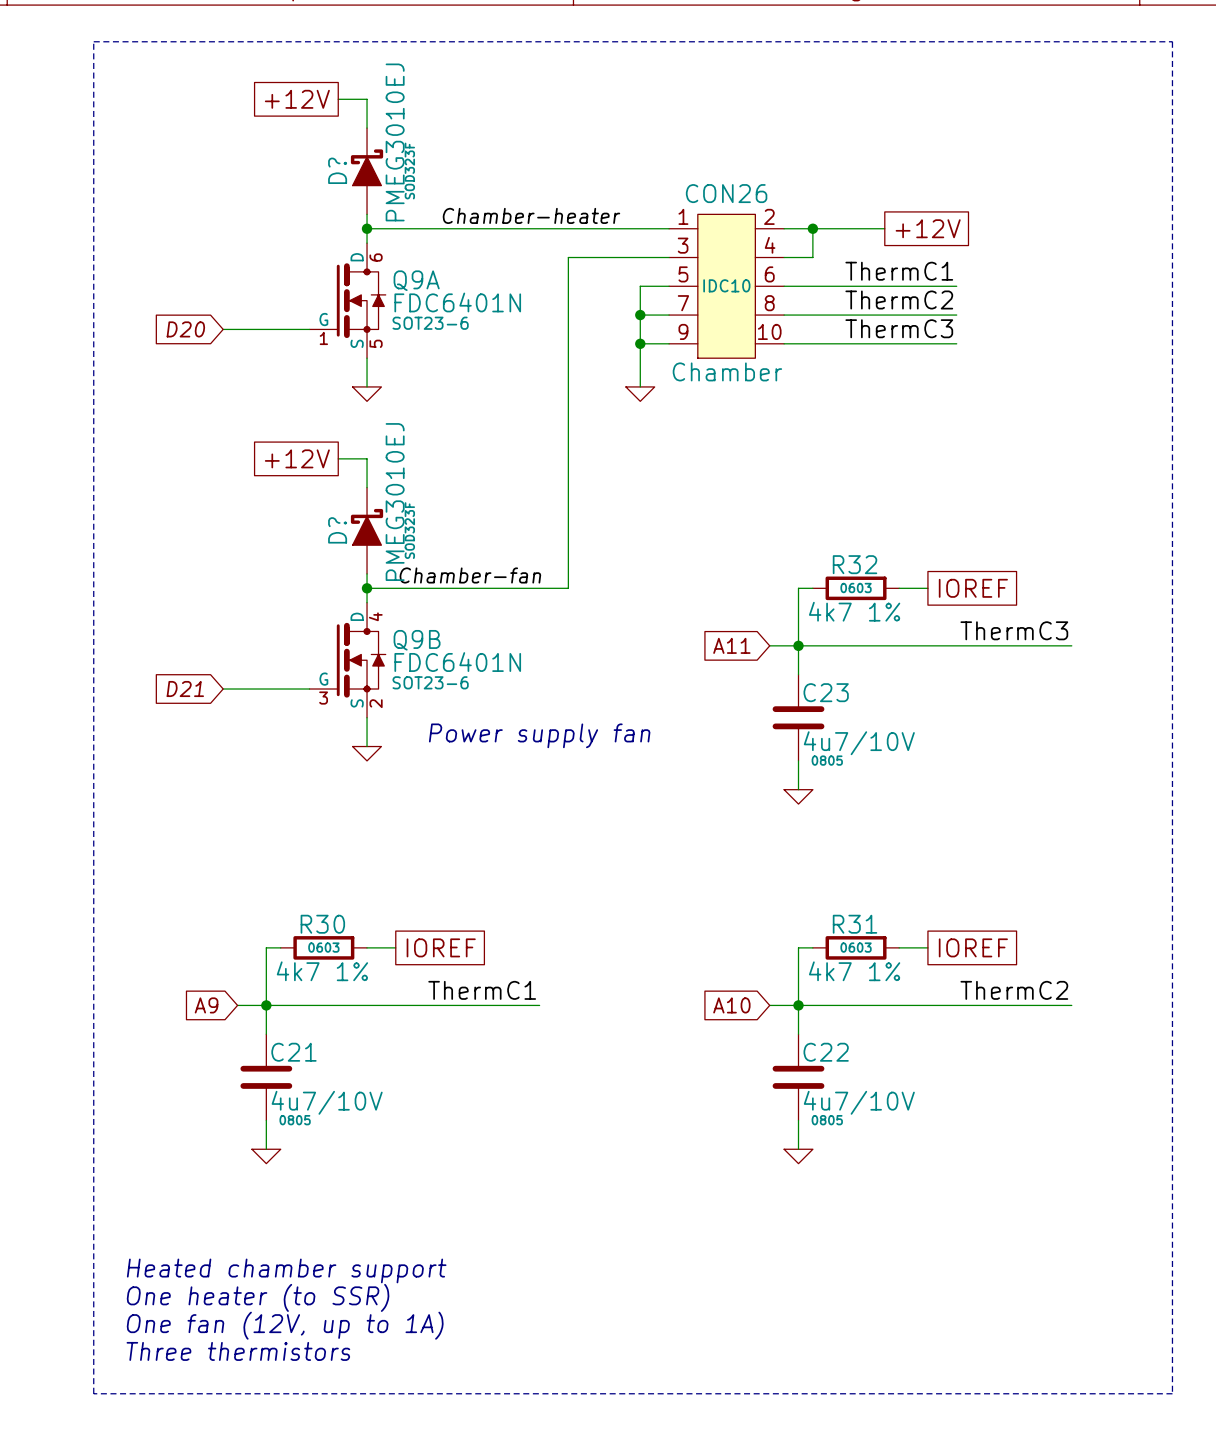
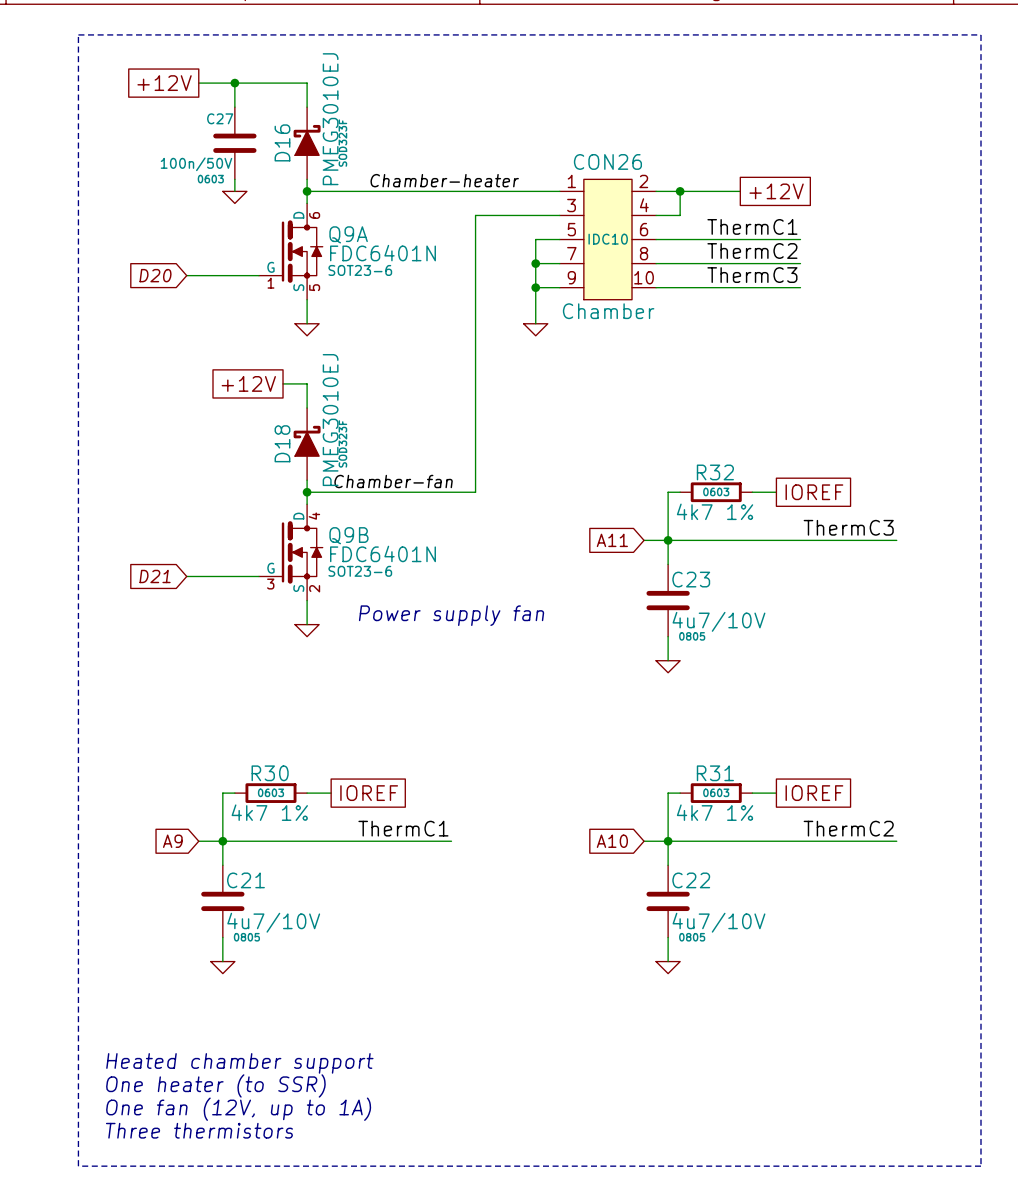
wire: none -> (198, 83) (283, 83)
wire: none -> (234, 83) (234, 107)
junction: none -> (234, 83)
global label position: +12V (297, 99) -> +12V (164, 83)
D? name: D? (337, 170) -> D16 (282, 142)
C27: none -> 100n/50V (234, 143)
wire: none -> (234, 179) (234, 191)
power symbol: none -> (234, 197)
D? name: D? (337, 530) -> D18 (282, 443)

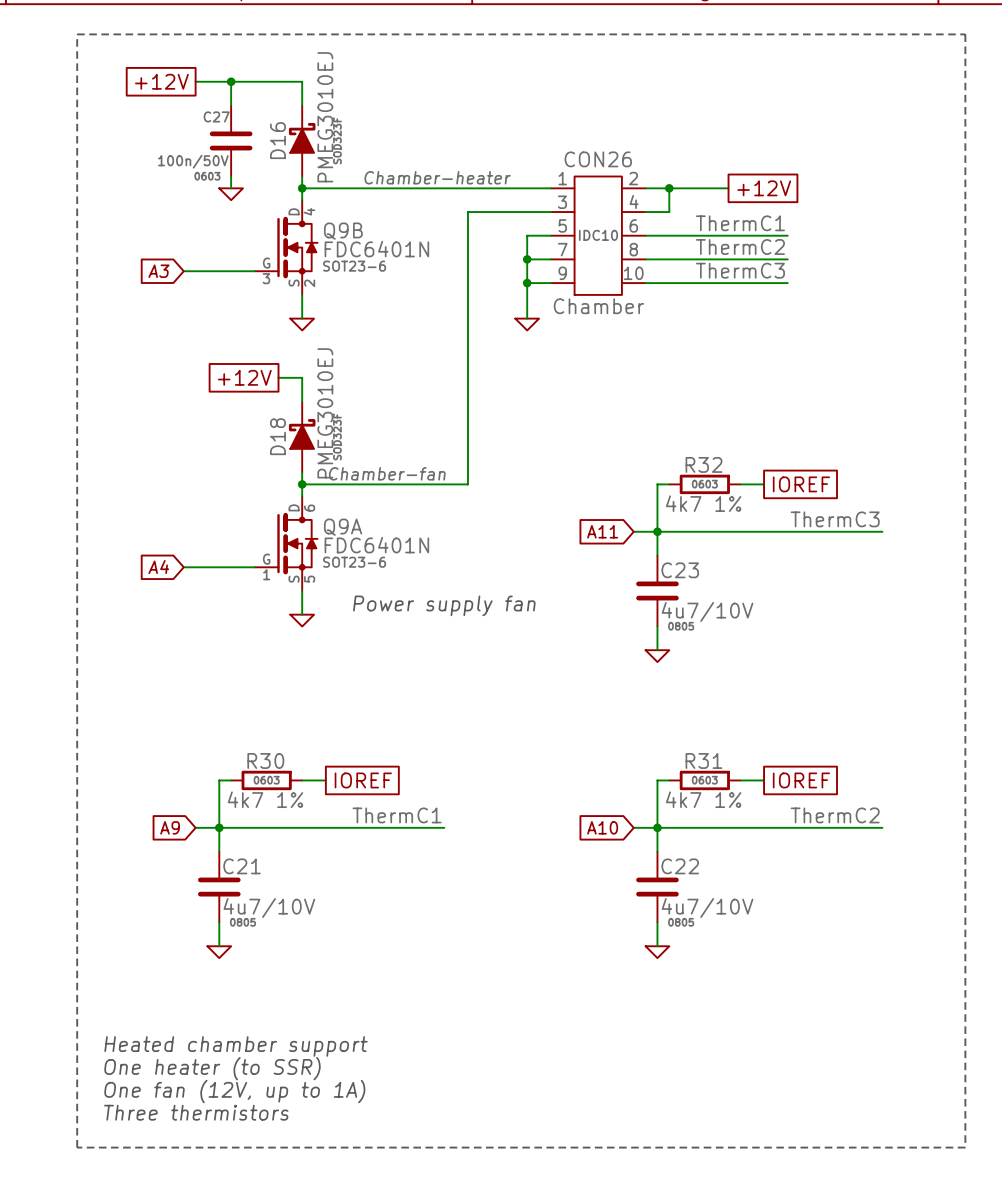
Q9A position: (290, 251) -> (286, 543)
global label: D20 (155, 275) -> A3 (158, 271)
Q9B position: (290, 552) -> (286, 247)
global label: D21 (155, 576) -> A4 (158, 567)

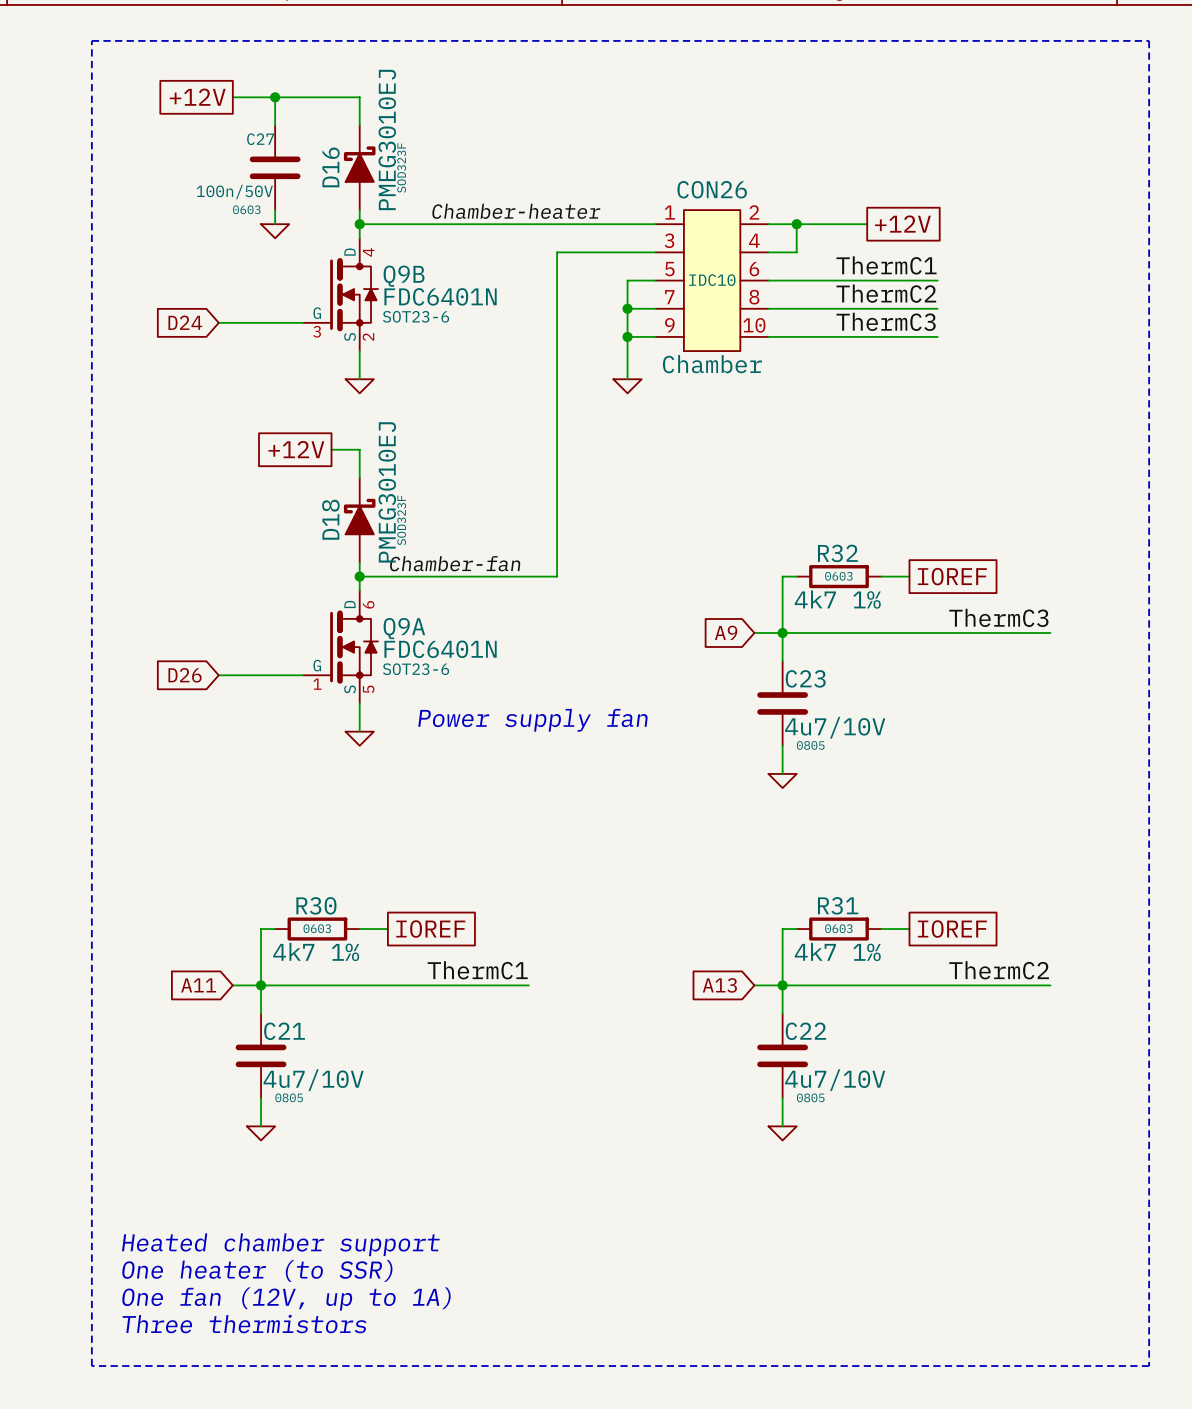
global label: A3 (158, 271) -> D24 (185, 322)
global label: A11 (602, 531) -> A9 (726, 632)
global label: A4 (158, 567) -> D26 (185, 675)
global label: A9 (170, 827) -> A11 (198, 985)
global label: A10 (602, 827) -> A13 (719, 985)

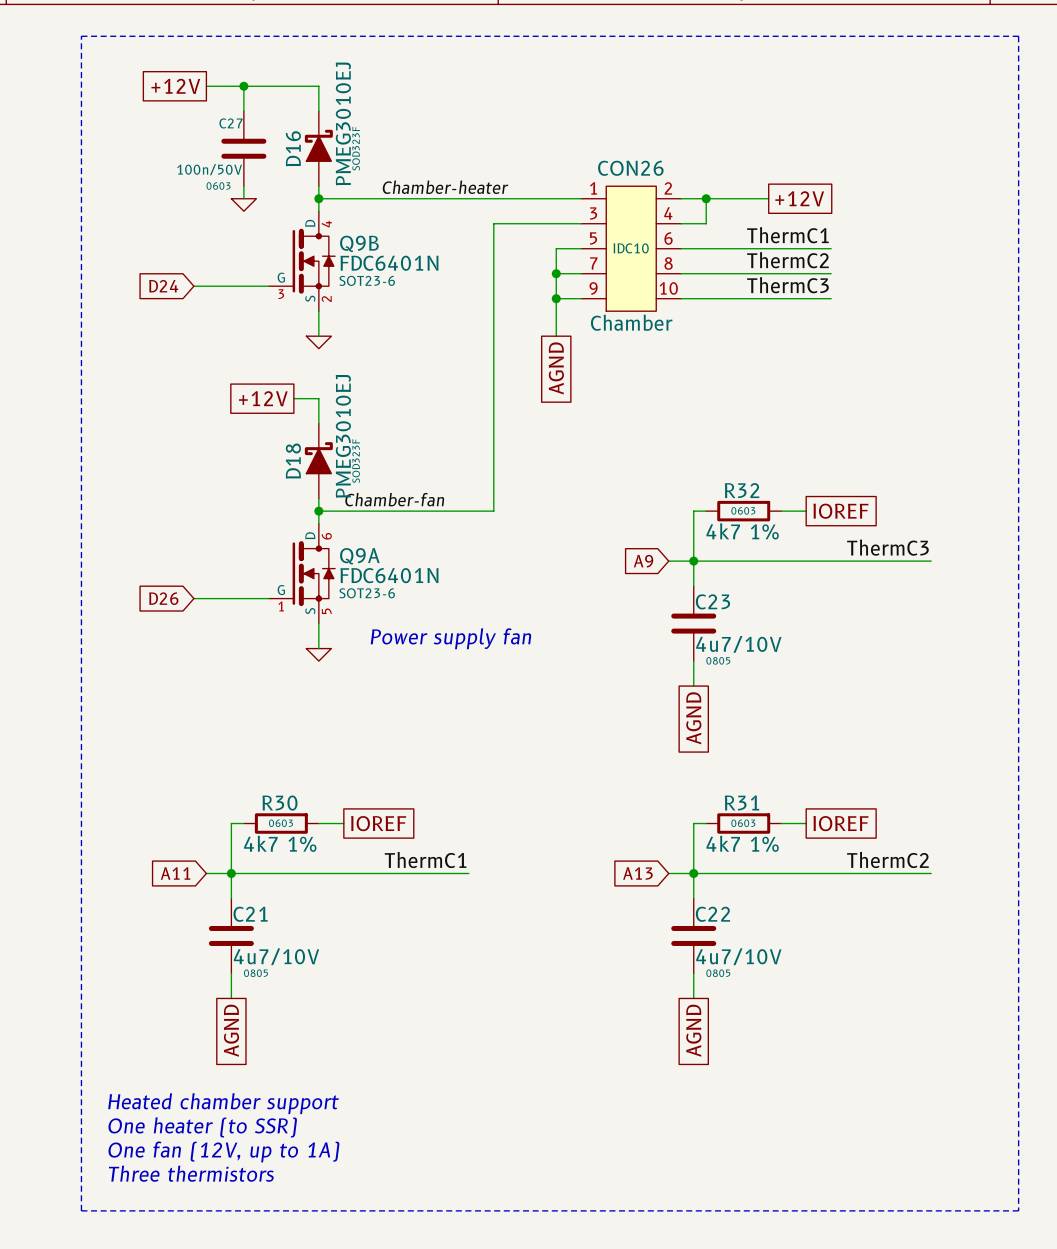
power symbol: (627, 386) -> none
global label: none -> AGND (556, 368)
power symbol: (782, 781) -> none
global label: none -> AGND (693, 718)
power symbol: (261, 1133) -> none
power symbol: (782, 1133) -> none
global label: none -> AGND (231, 1030)
global label: none -> AGND (693, 1030)

